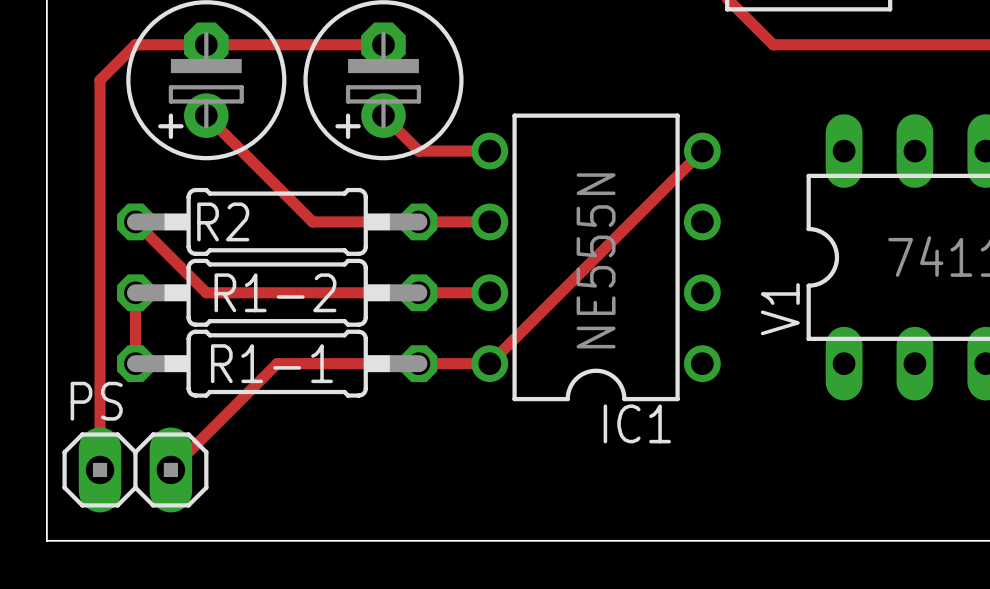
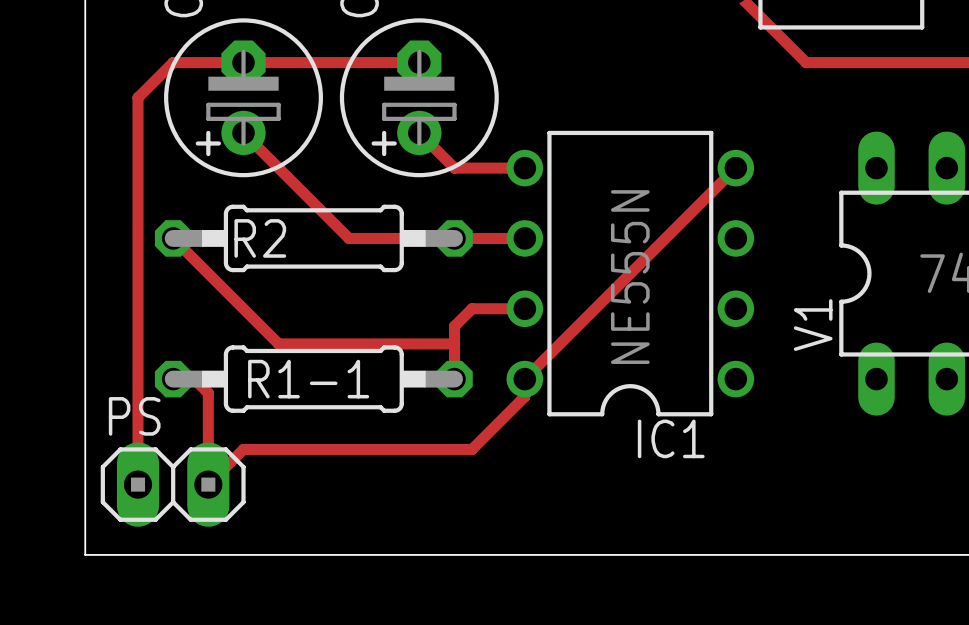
track: (135, 292) (135, 363) -> (208, 484) (208, 393) (194, 379) (173, 379)
track: (206, 292) (436, 292) -> (243, 308) (278, 343) (454, 343)
R1-2: (277, 292) -> none
track: none -> (472, 308) (454, 326) (454, 379)
track: (489, 363) (277, 363) (206, 434) -> (524, 379) (524, 396) (472, 449) (243, 449)

